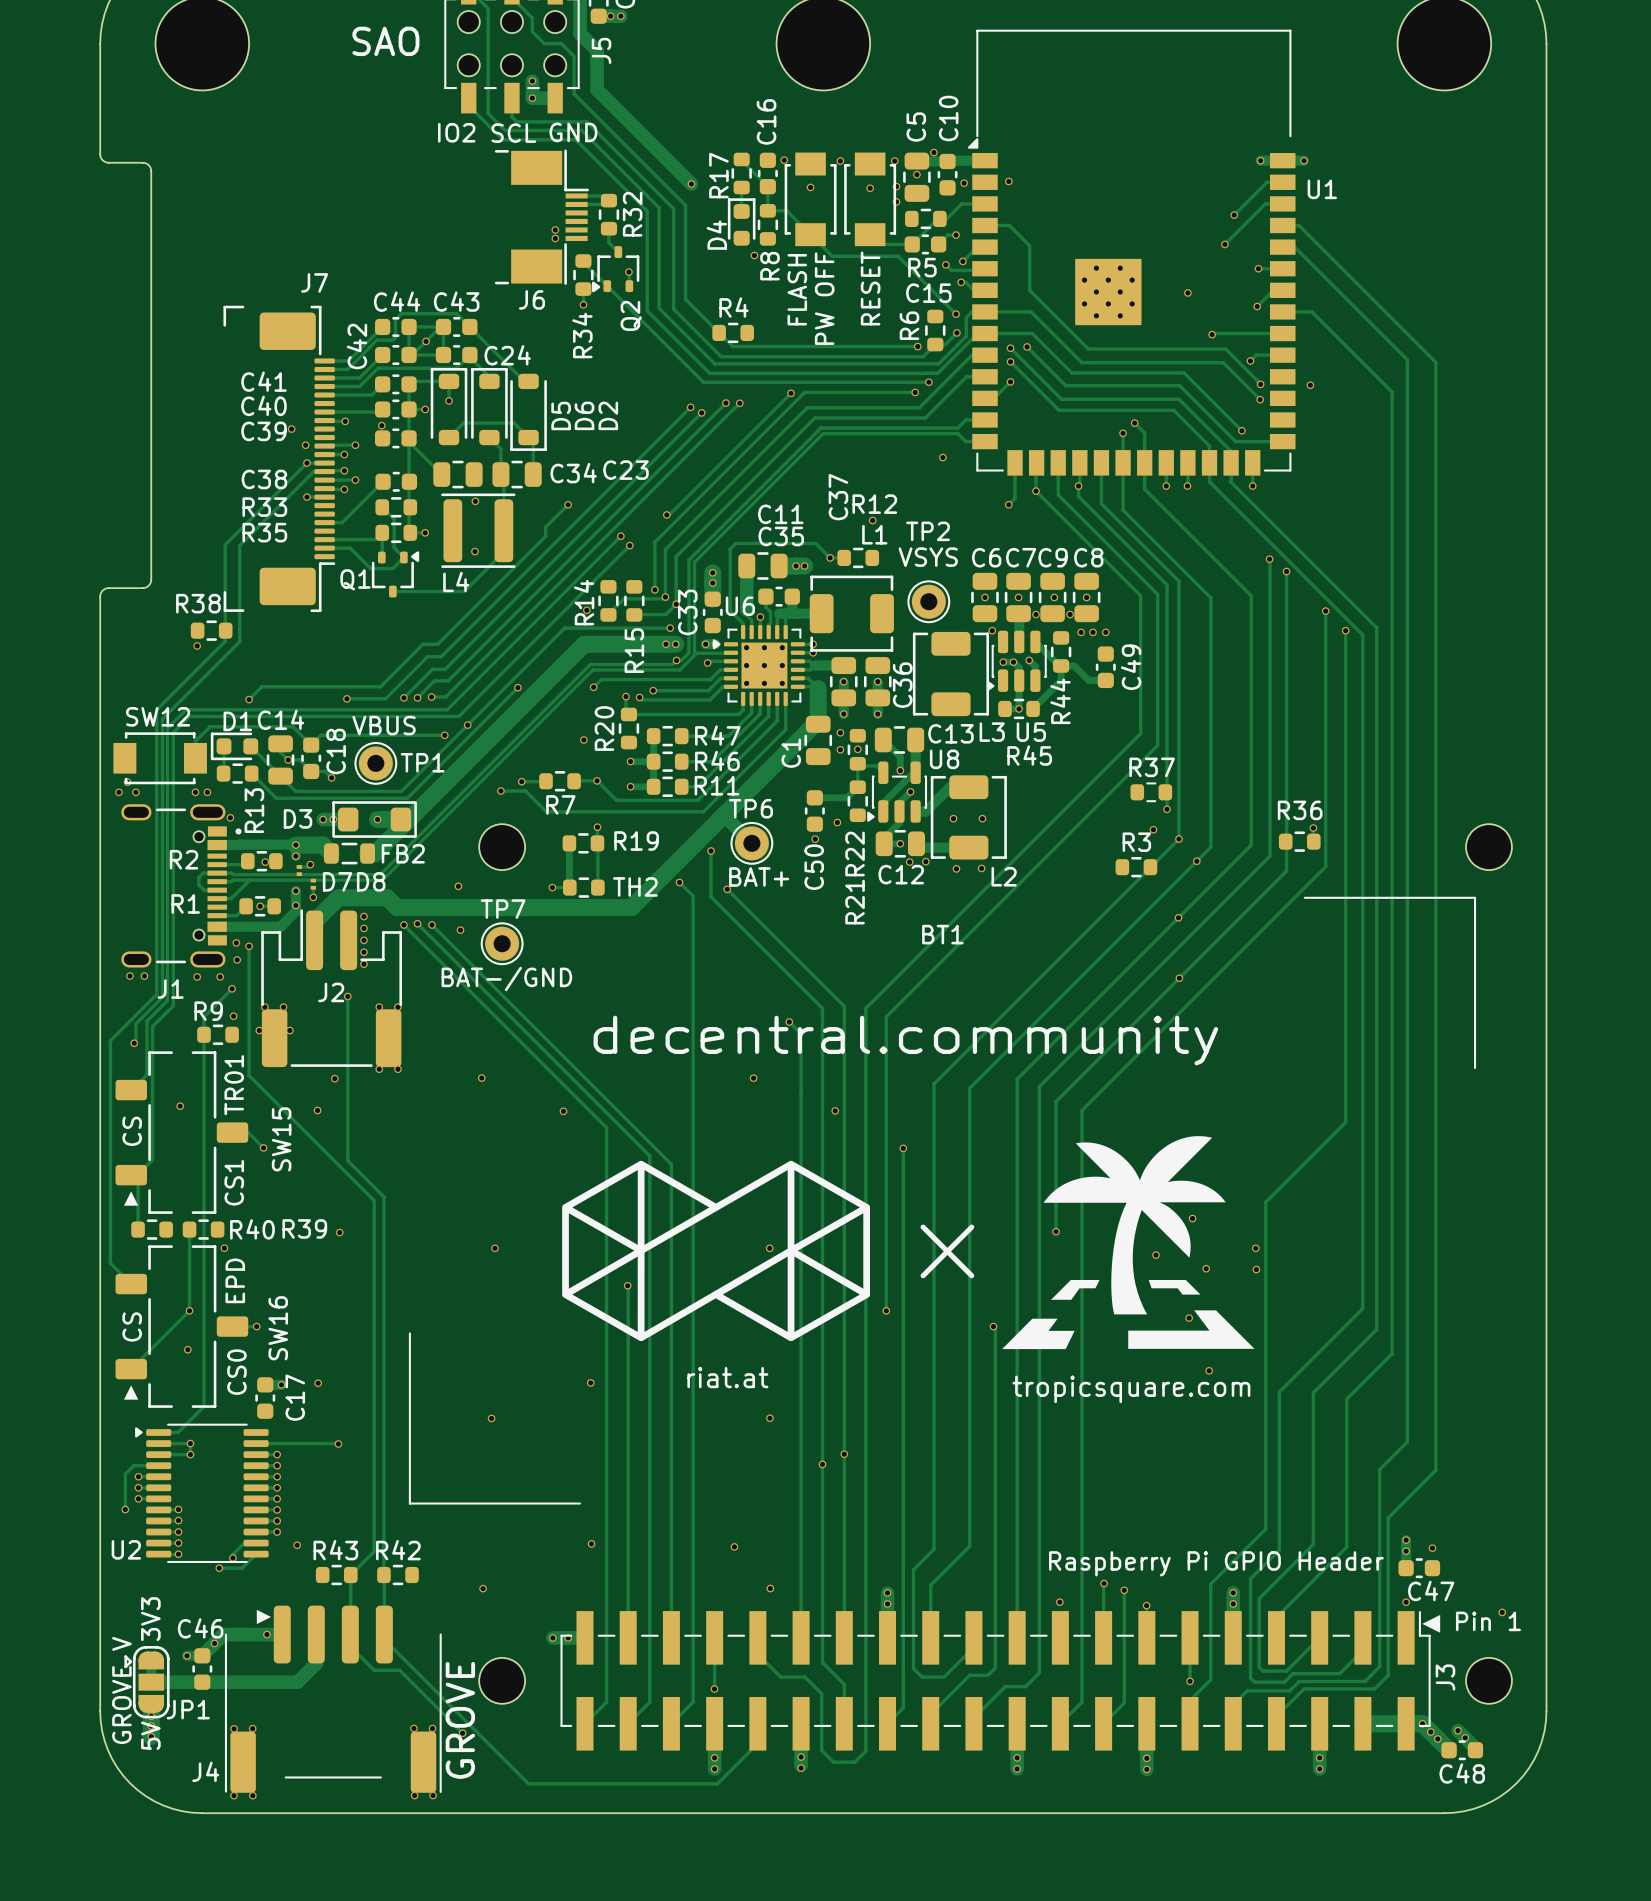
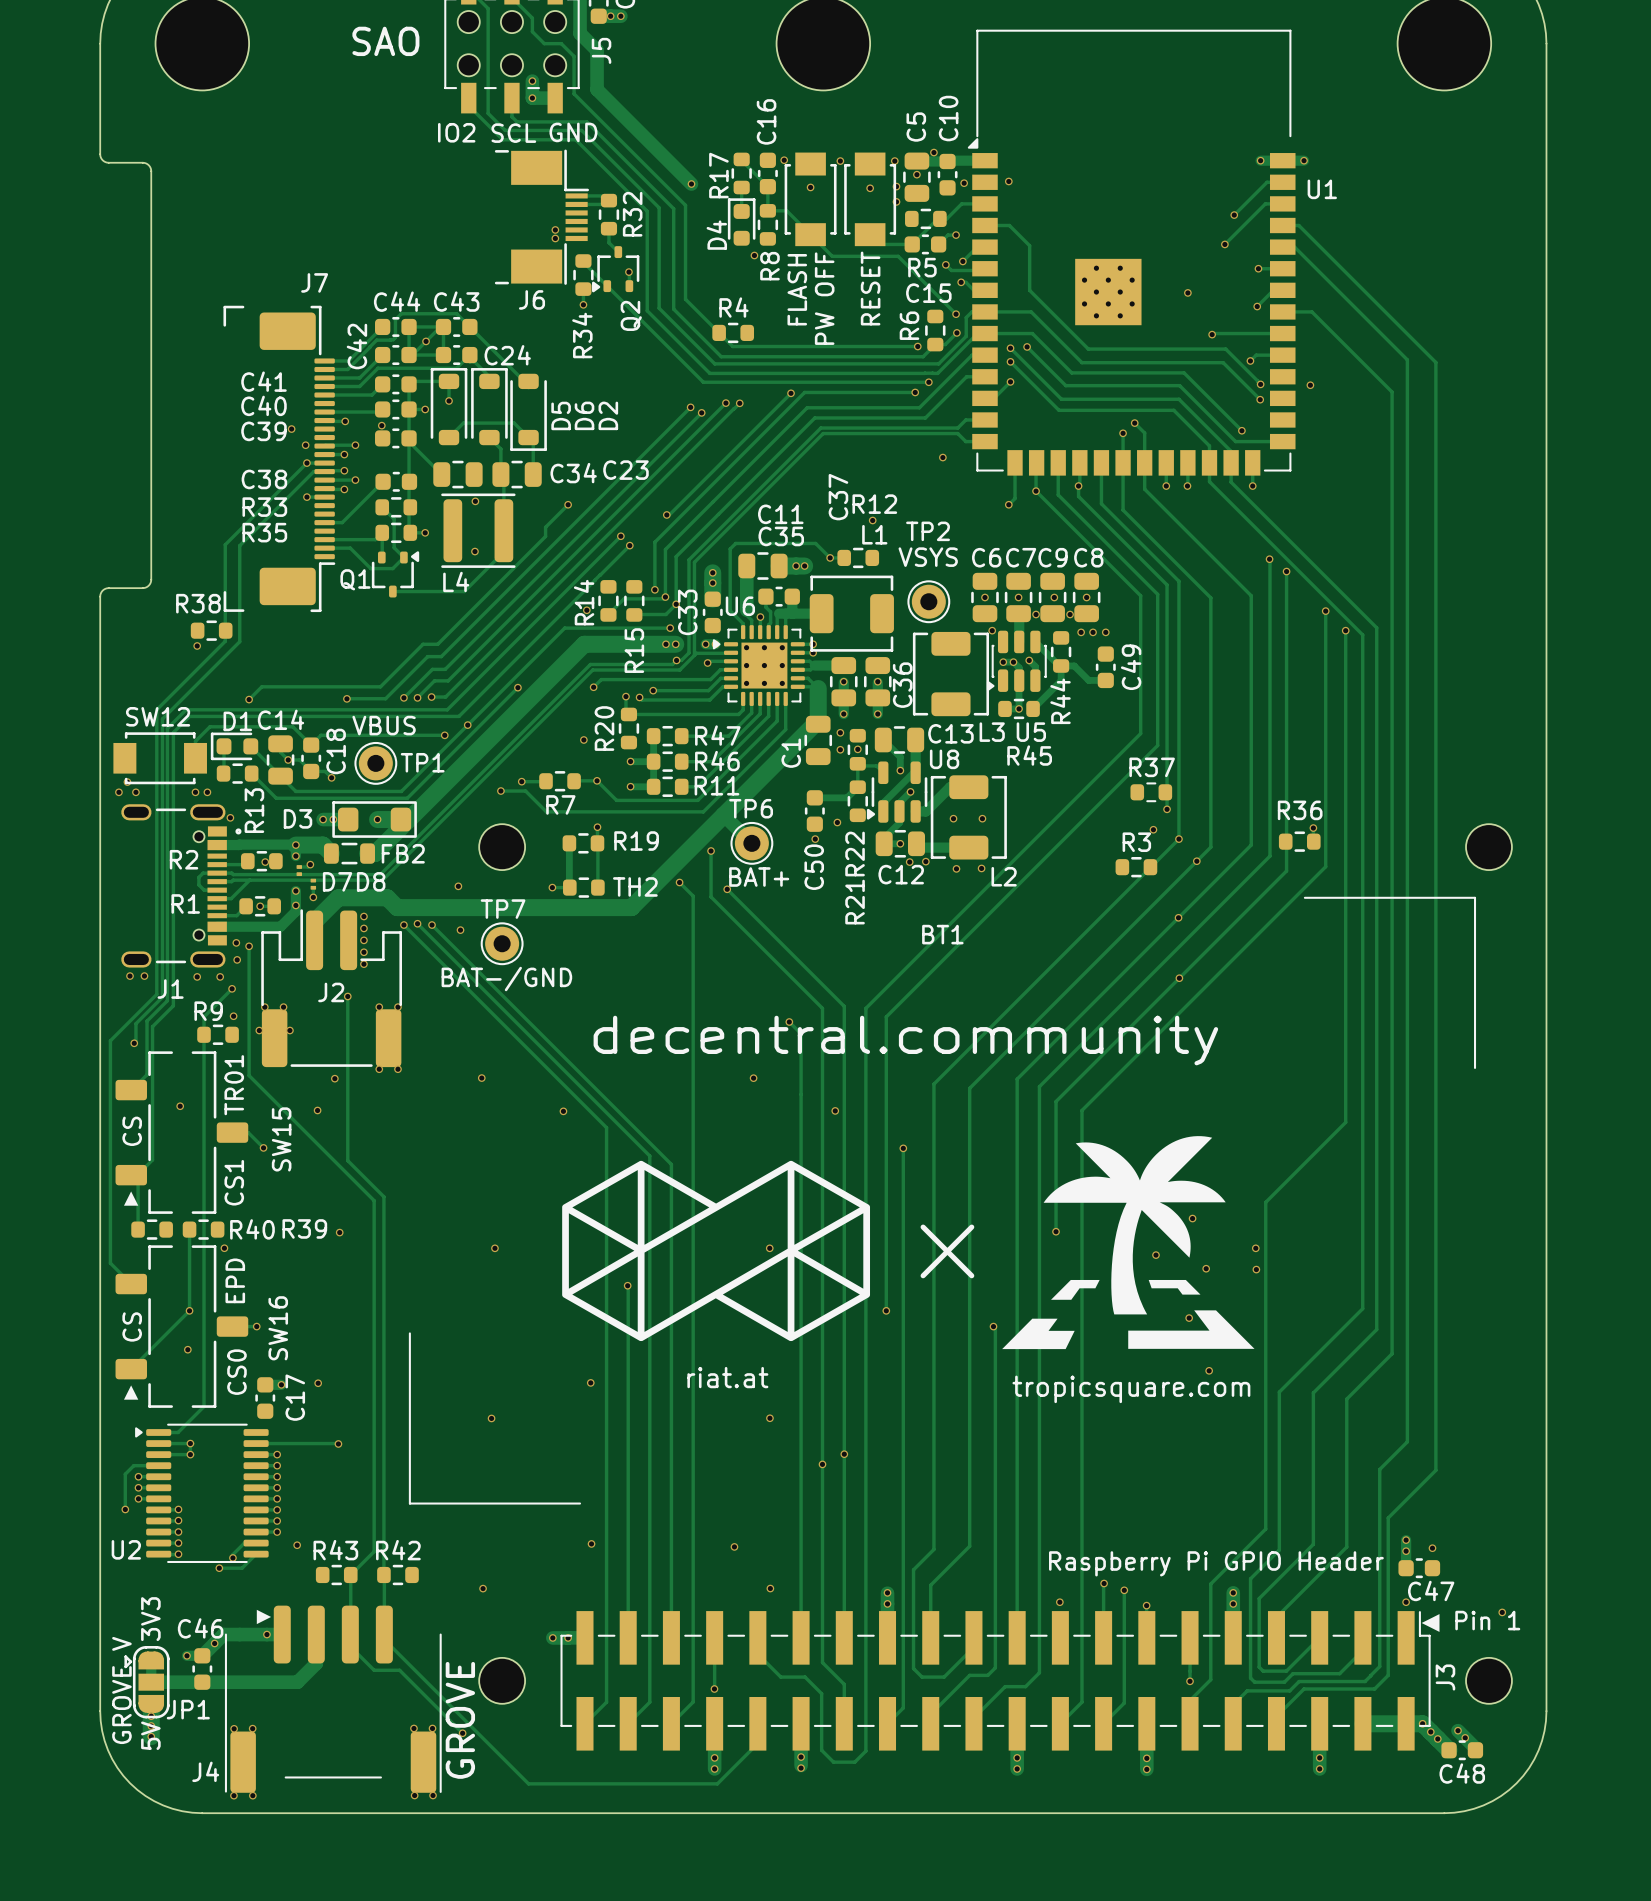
U8 footprint: [867, 761, 928, 823] -> [866, 761, 928, 823]
drawing: none -> [1420, 1610, 1521, 1634]
text: ◀ Pin 1 (1470, 1622) -> none

